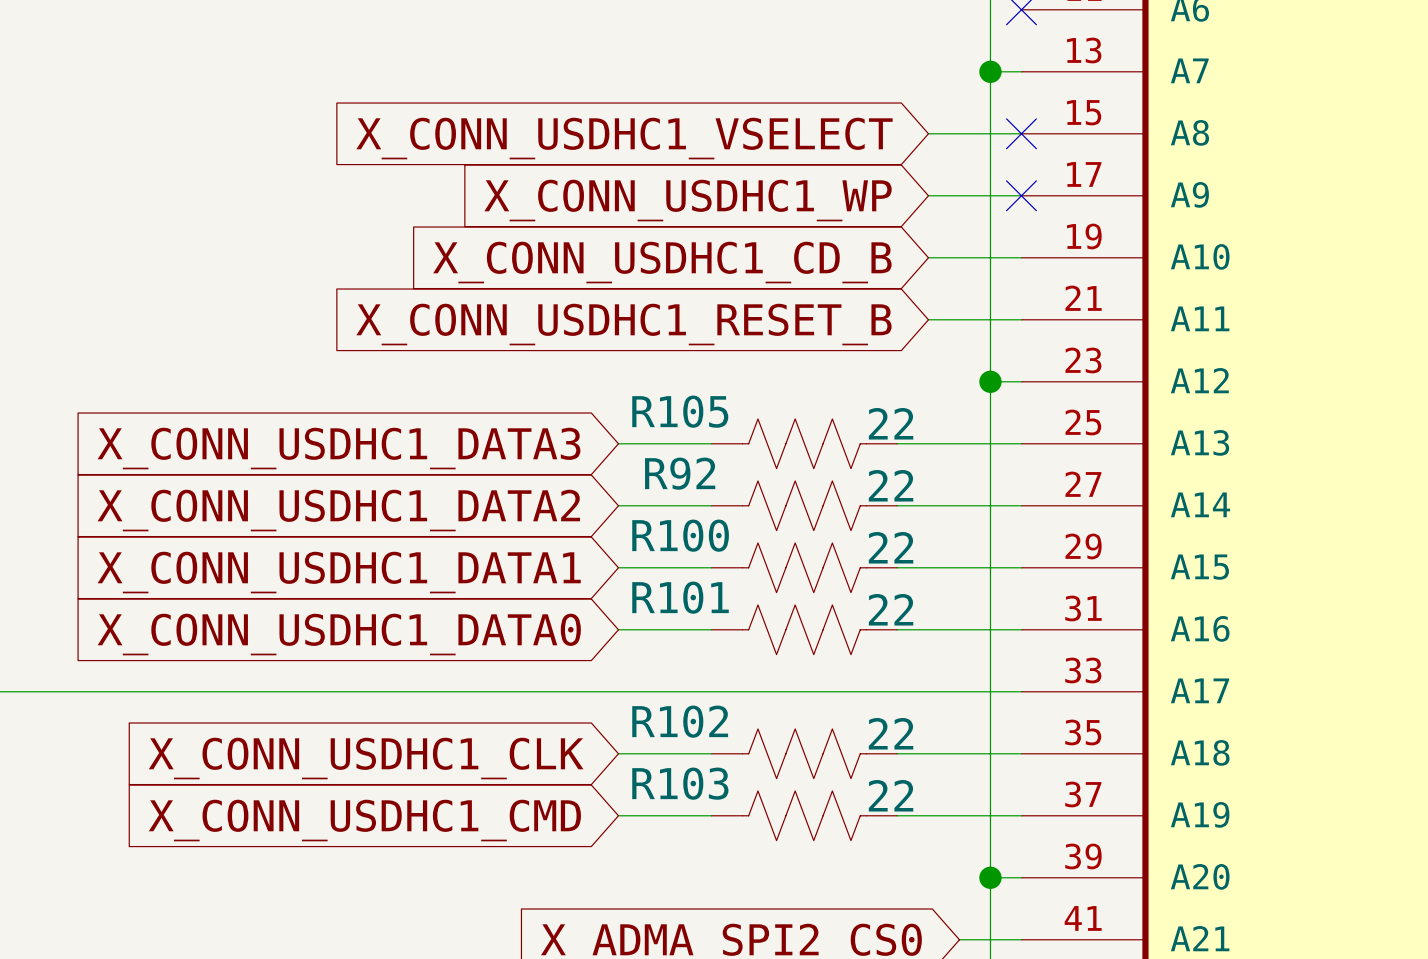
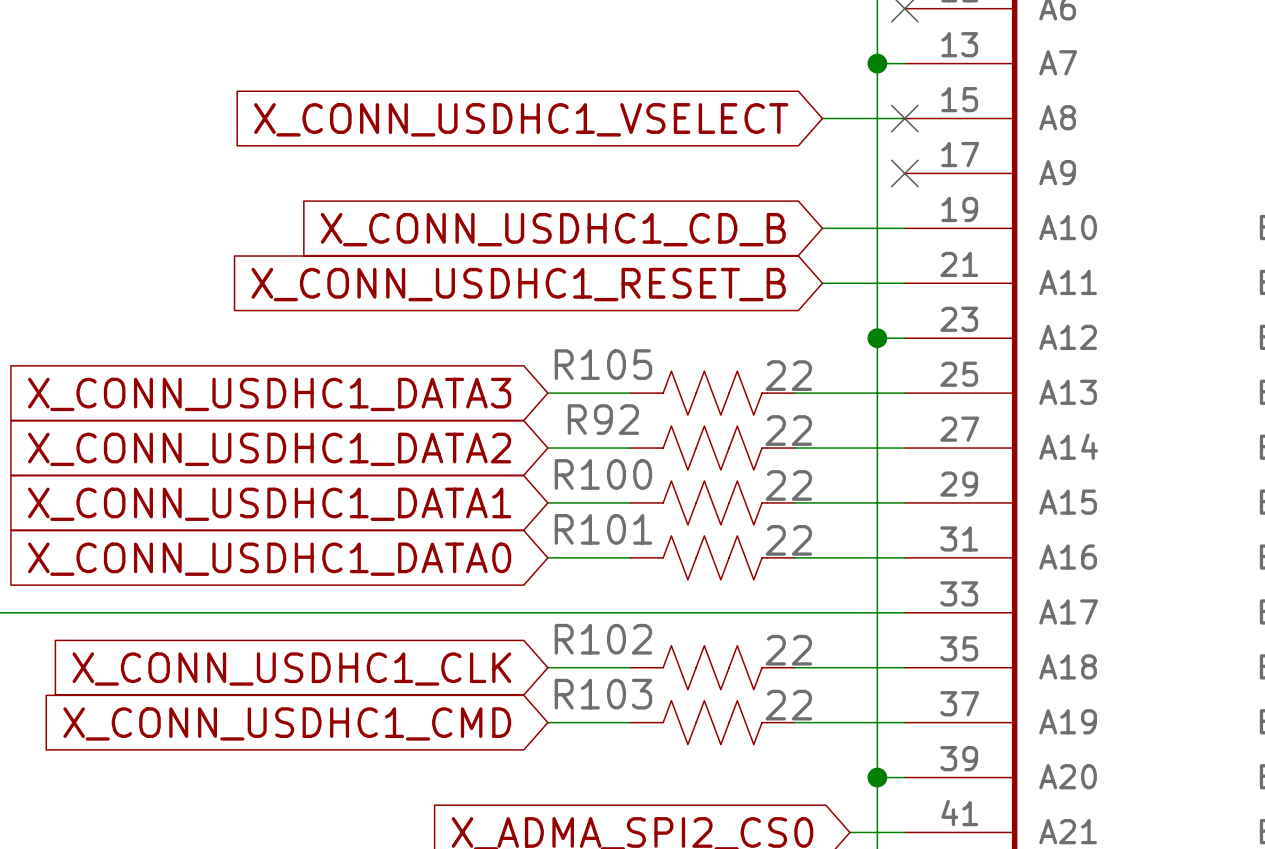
wire: (928, 195) (1021, 195) -> none
global label: X_CONN_USDHC1_WP (688, 200) -> none

